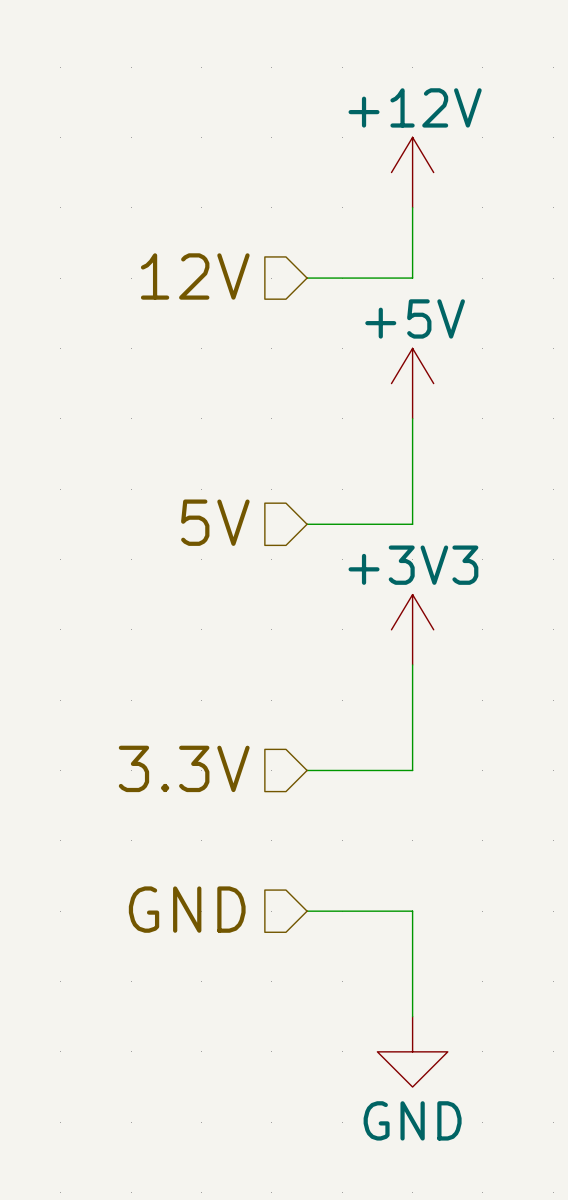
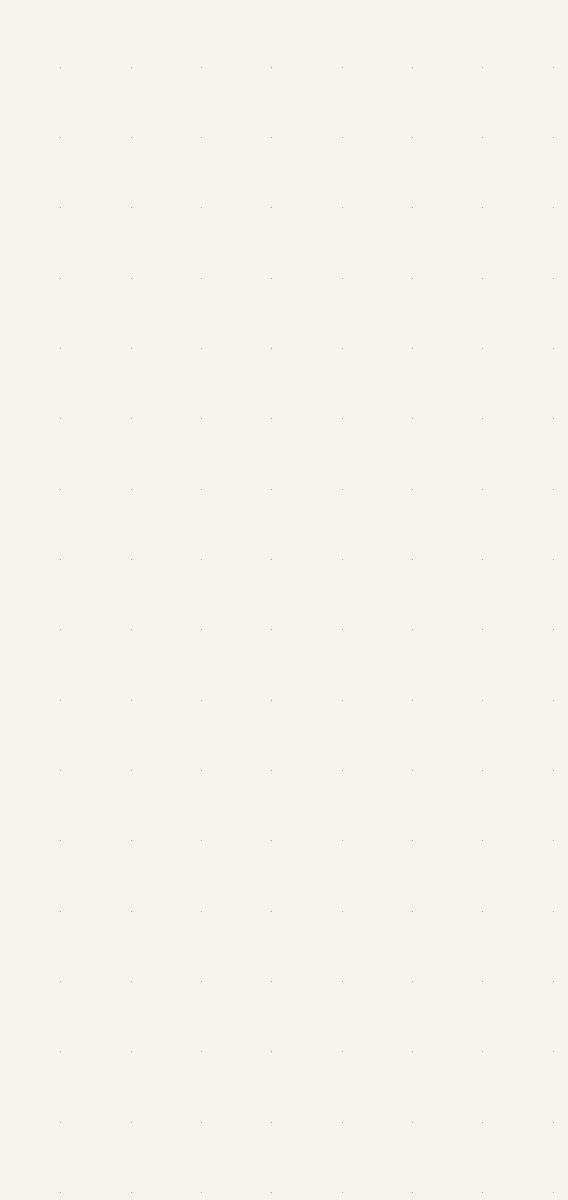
power symbol: +12V (412, 172) -> none
wire: (412, 207) (412, 278) (307, 278) -> none
hierarchical label: 12V (195, 276) -> none
power symbol: +5V (412, 383) -> none
wire: (412, 418) (412, 524) (307, 524) -> none
hierarchical label: 5V (215, 522) -> none
power symbol: +3V3 (412, 629) -> none
wire: (412, 664) (412, 770) (307, 770) -> none
hierarchical label: 3.3V (184, 768) -> none
hierarchical label: GND (187, 909) -> none
wire: (307, 911) (412, 911) (412, 1016) -> none
power symbol: GND (412, 1051) -> none

